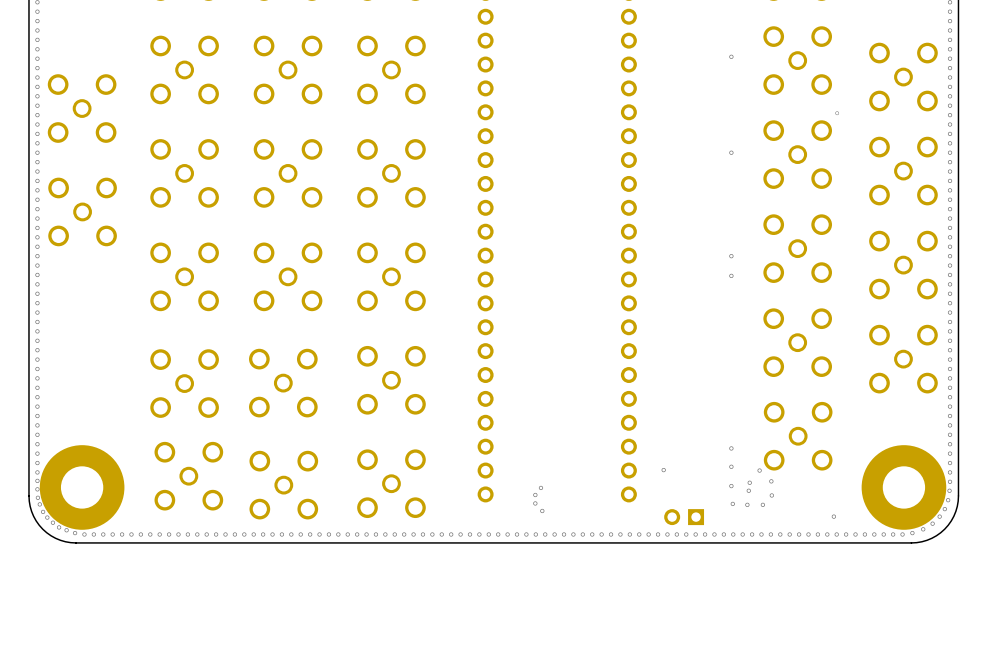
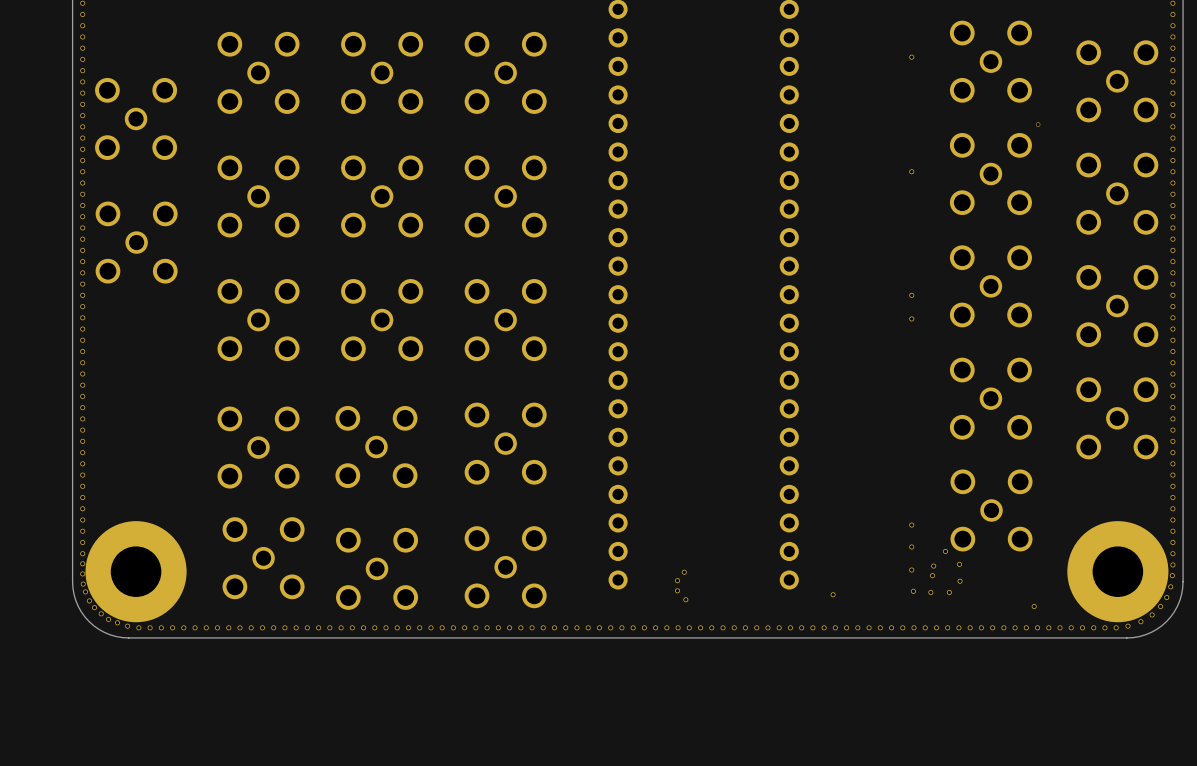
via position: (663, 470) -> (833, 594)
part: (684, 517) -> none

